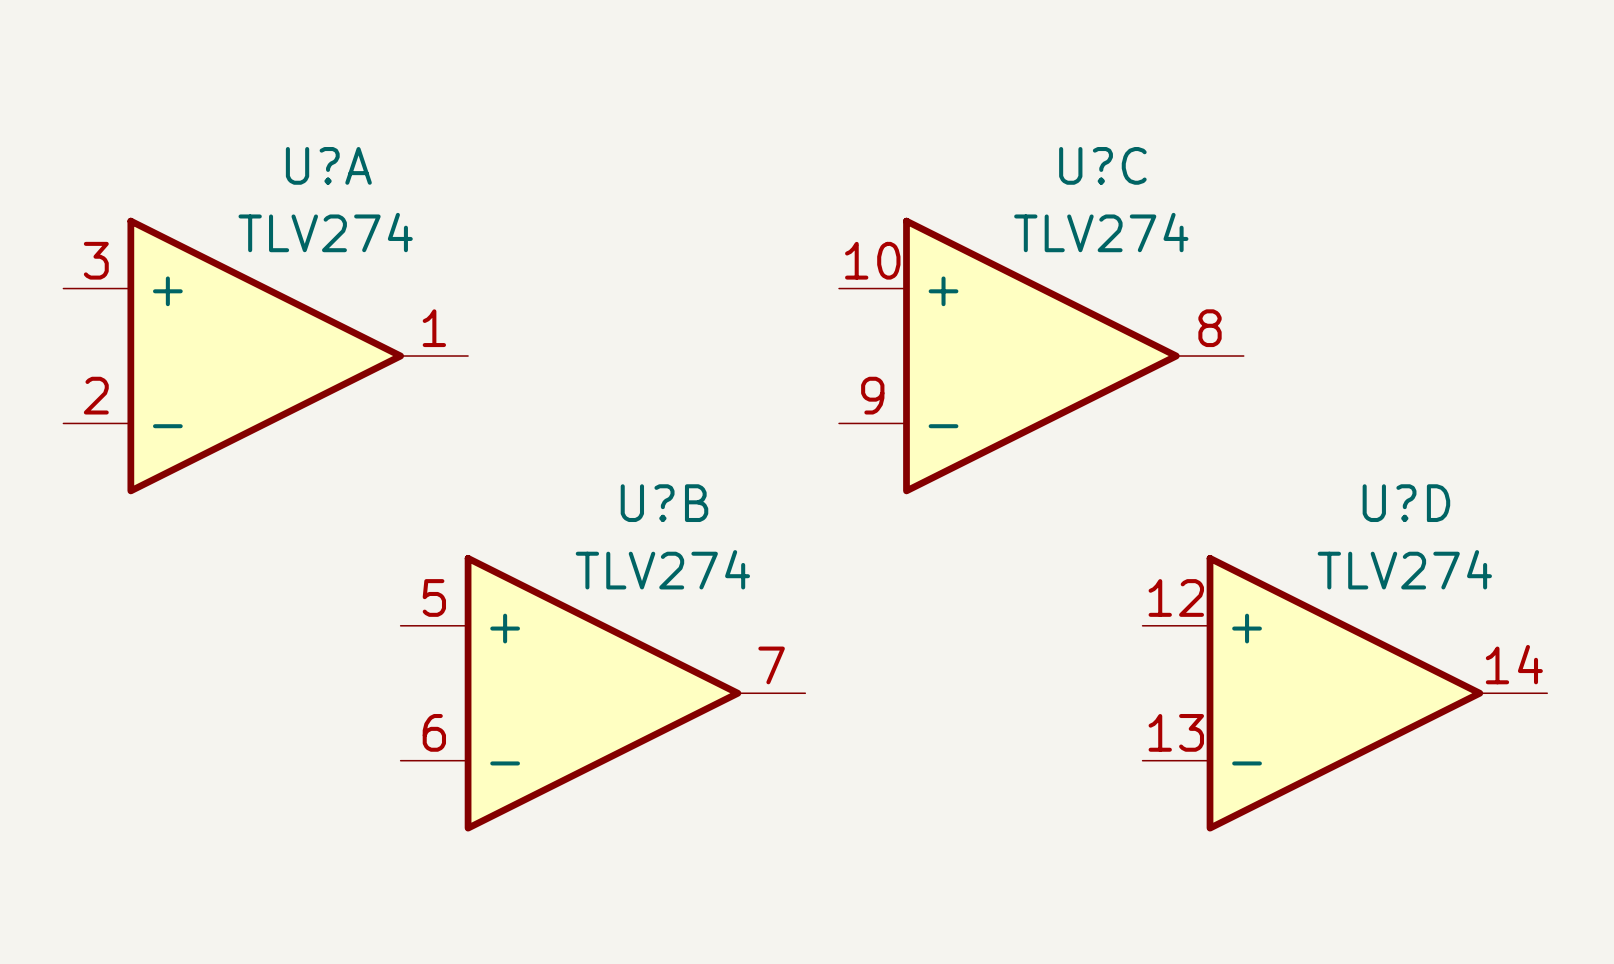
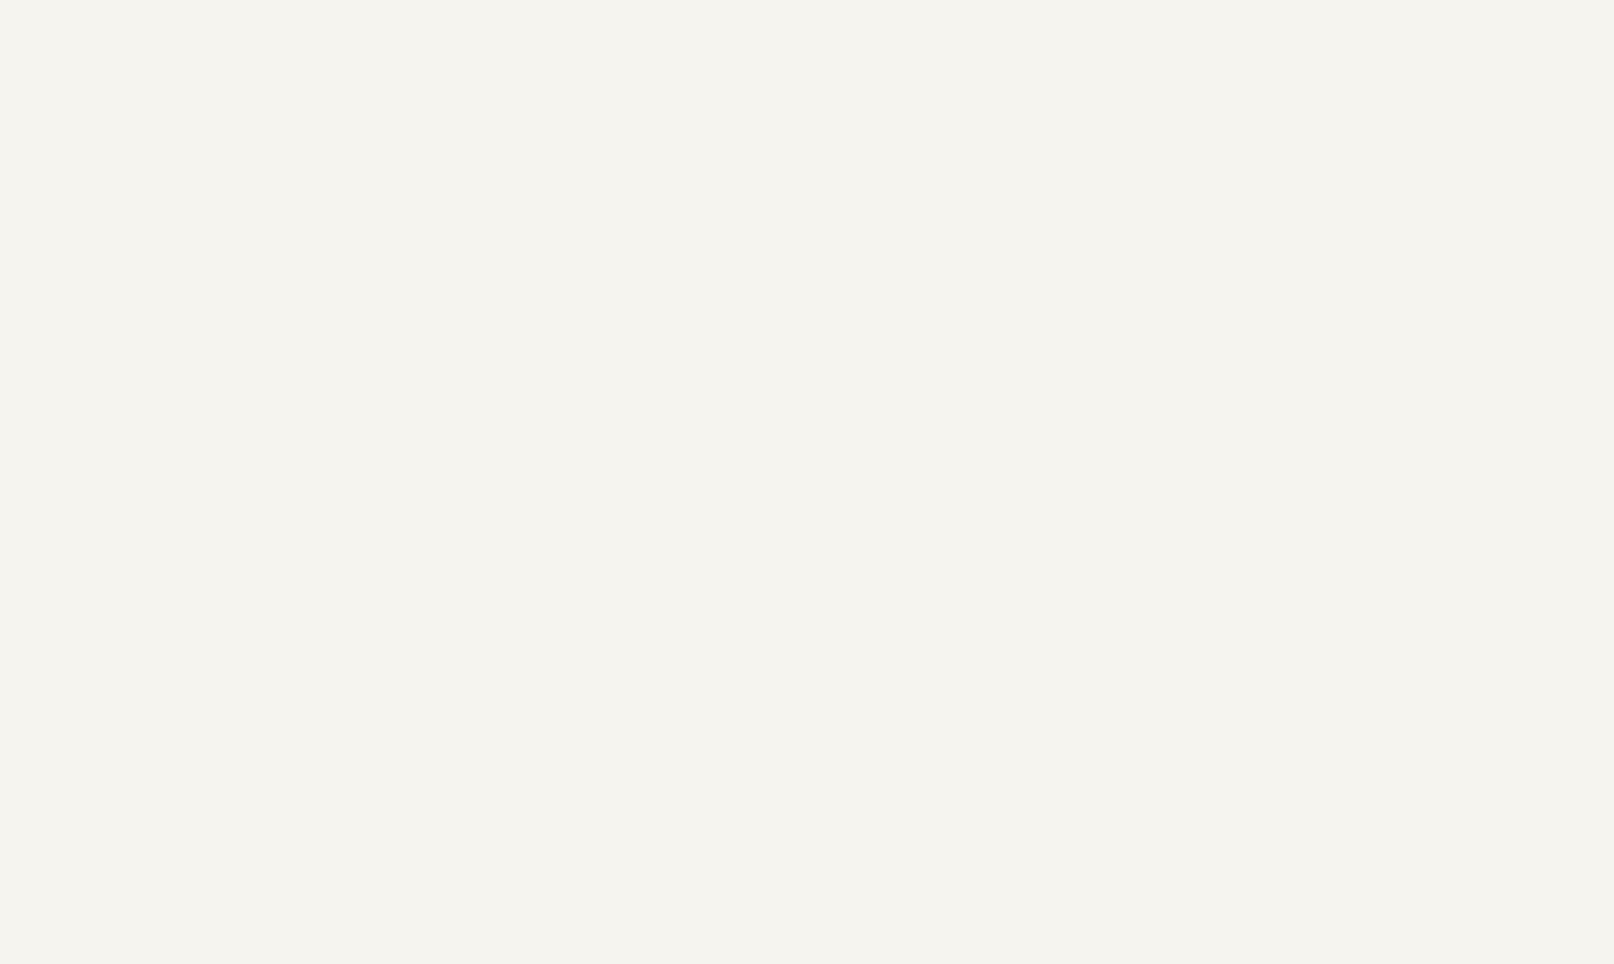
U?A: TLV274 (265, 356) -> none
U?C: TLV274 (1041, 356) -> none
U?B: TLV274 (602, 693) -> none
U?D: TLV274 (1344, 693) -> none

